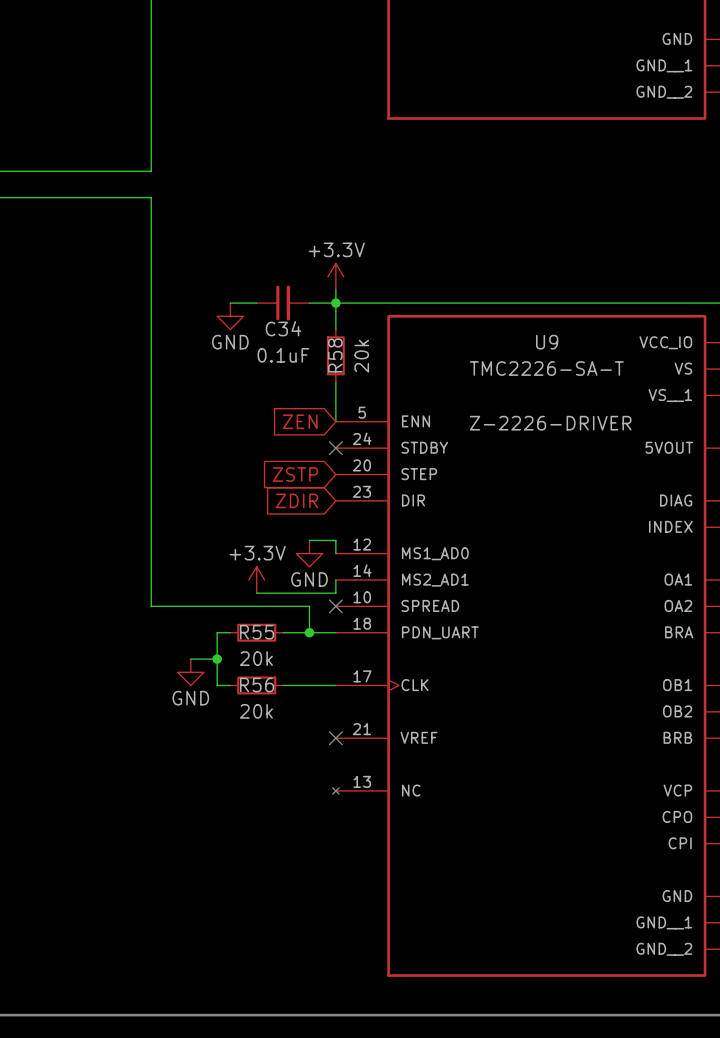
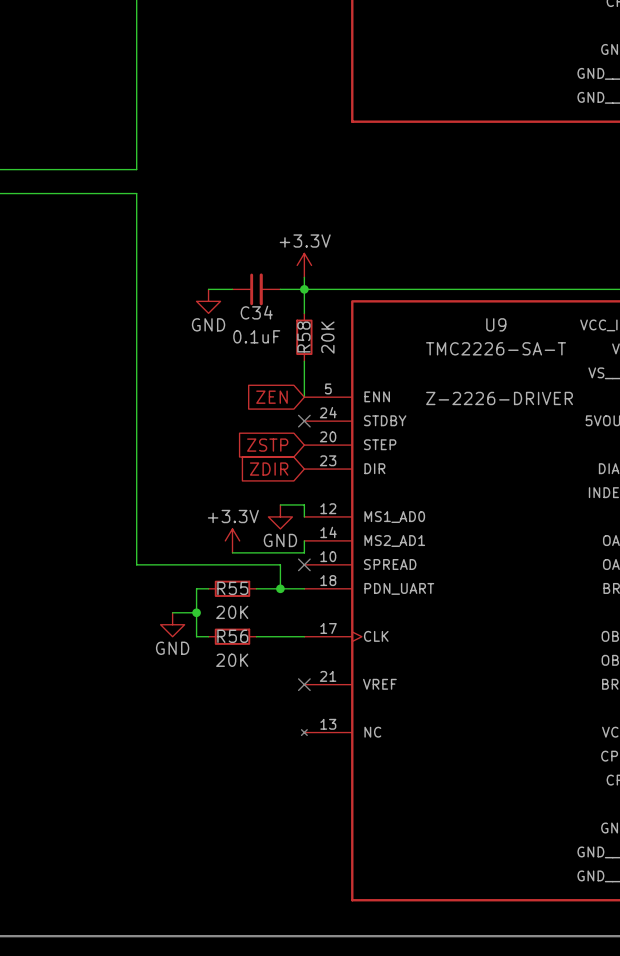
R58 value: 20k (361, 356) -> 20K (327, 337)
R55 value: 20k (256, 658) -> 20K (232, 612)
R56 value: 20k (256, 711) -> 20K (232, 660)

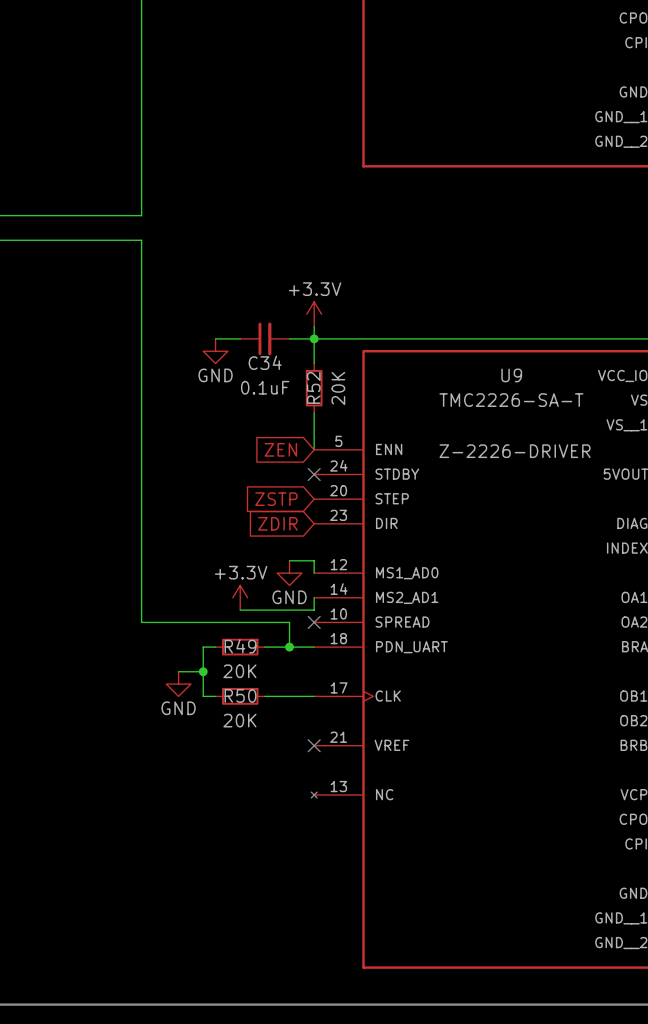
R58 name: R58 (303, 337) -> R52 (313, 387)
R55 name: R55 (232, 588) -> R49 (240, 646)
R56 name: R56 (232, 636) -> R50 (240, 695)

